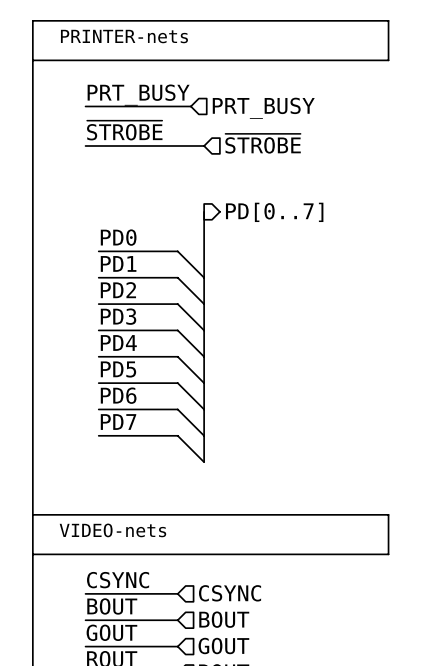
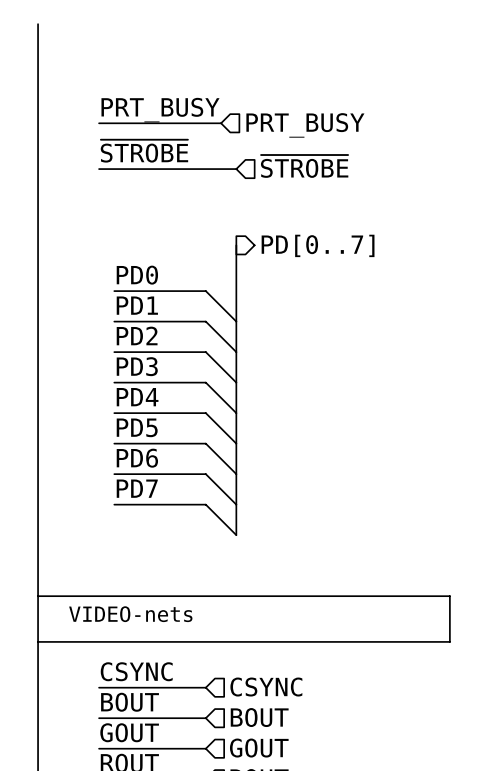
line: (32, 20) (388, 20) (388, 60) (32, 60) -> none
text: PRINTER-nets (124, 36) -> none

